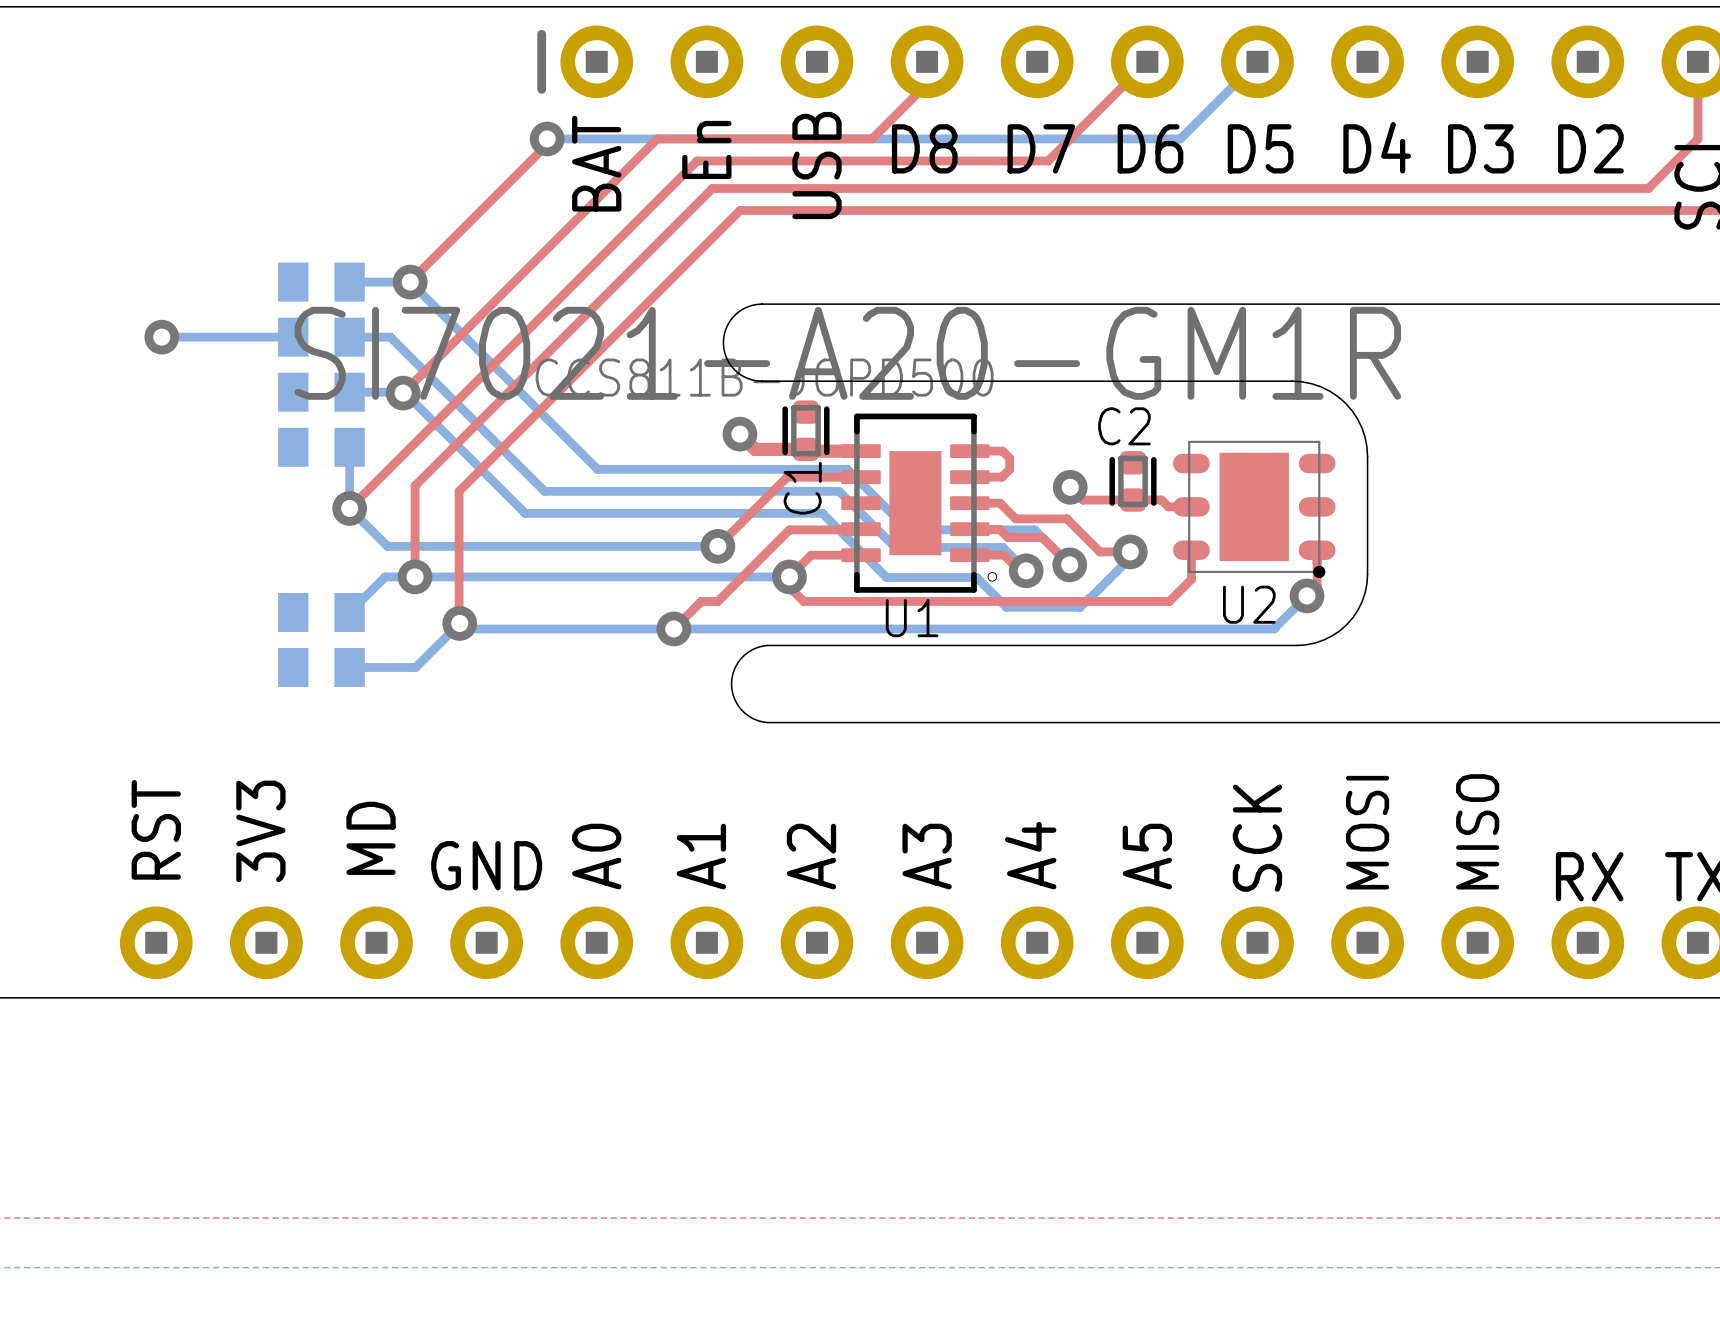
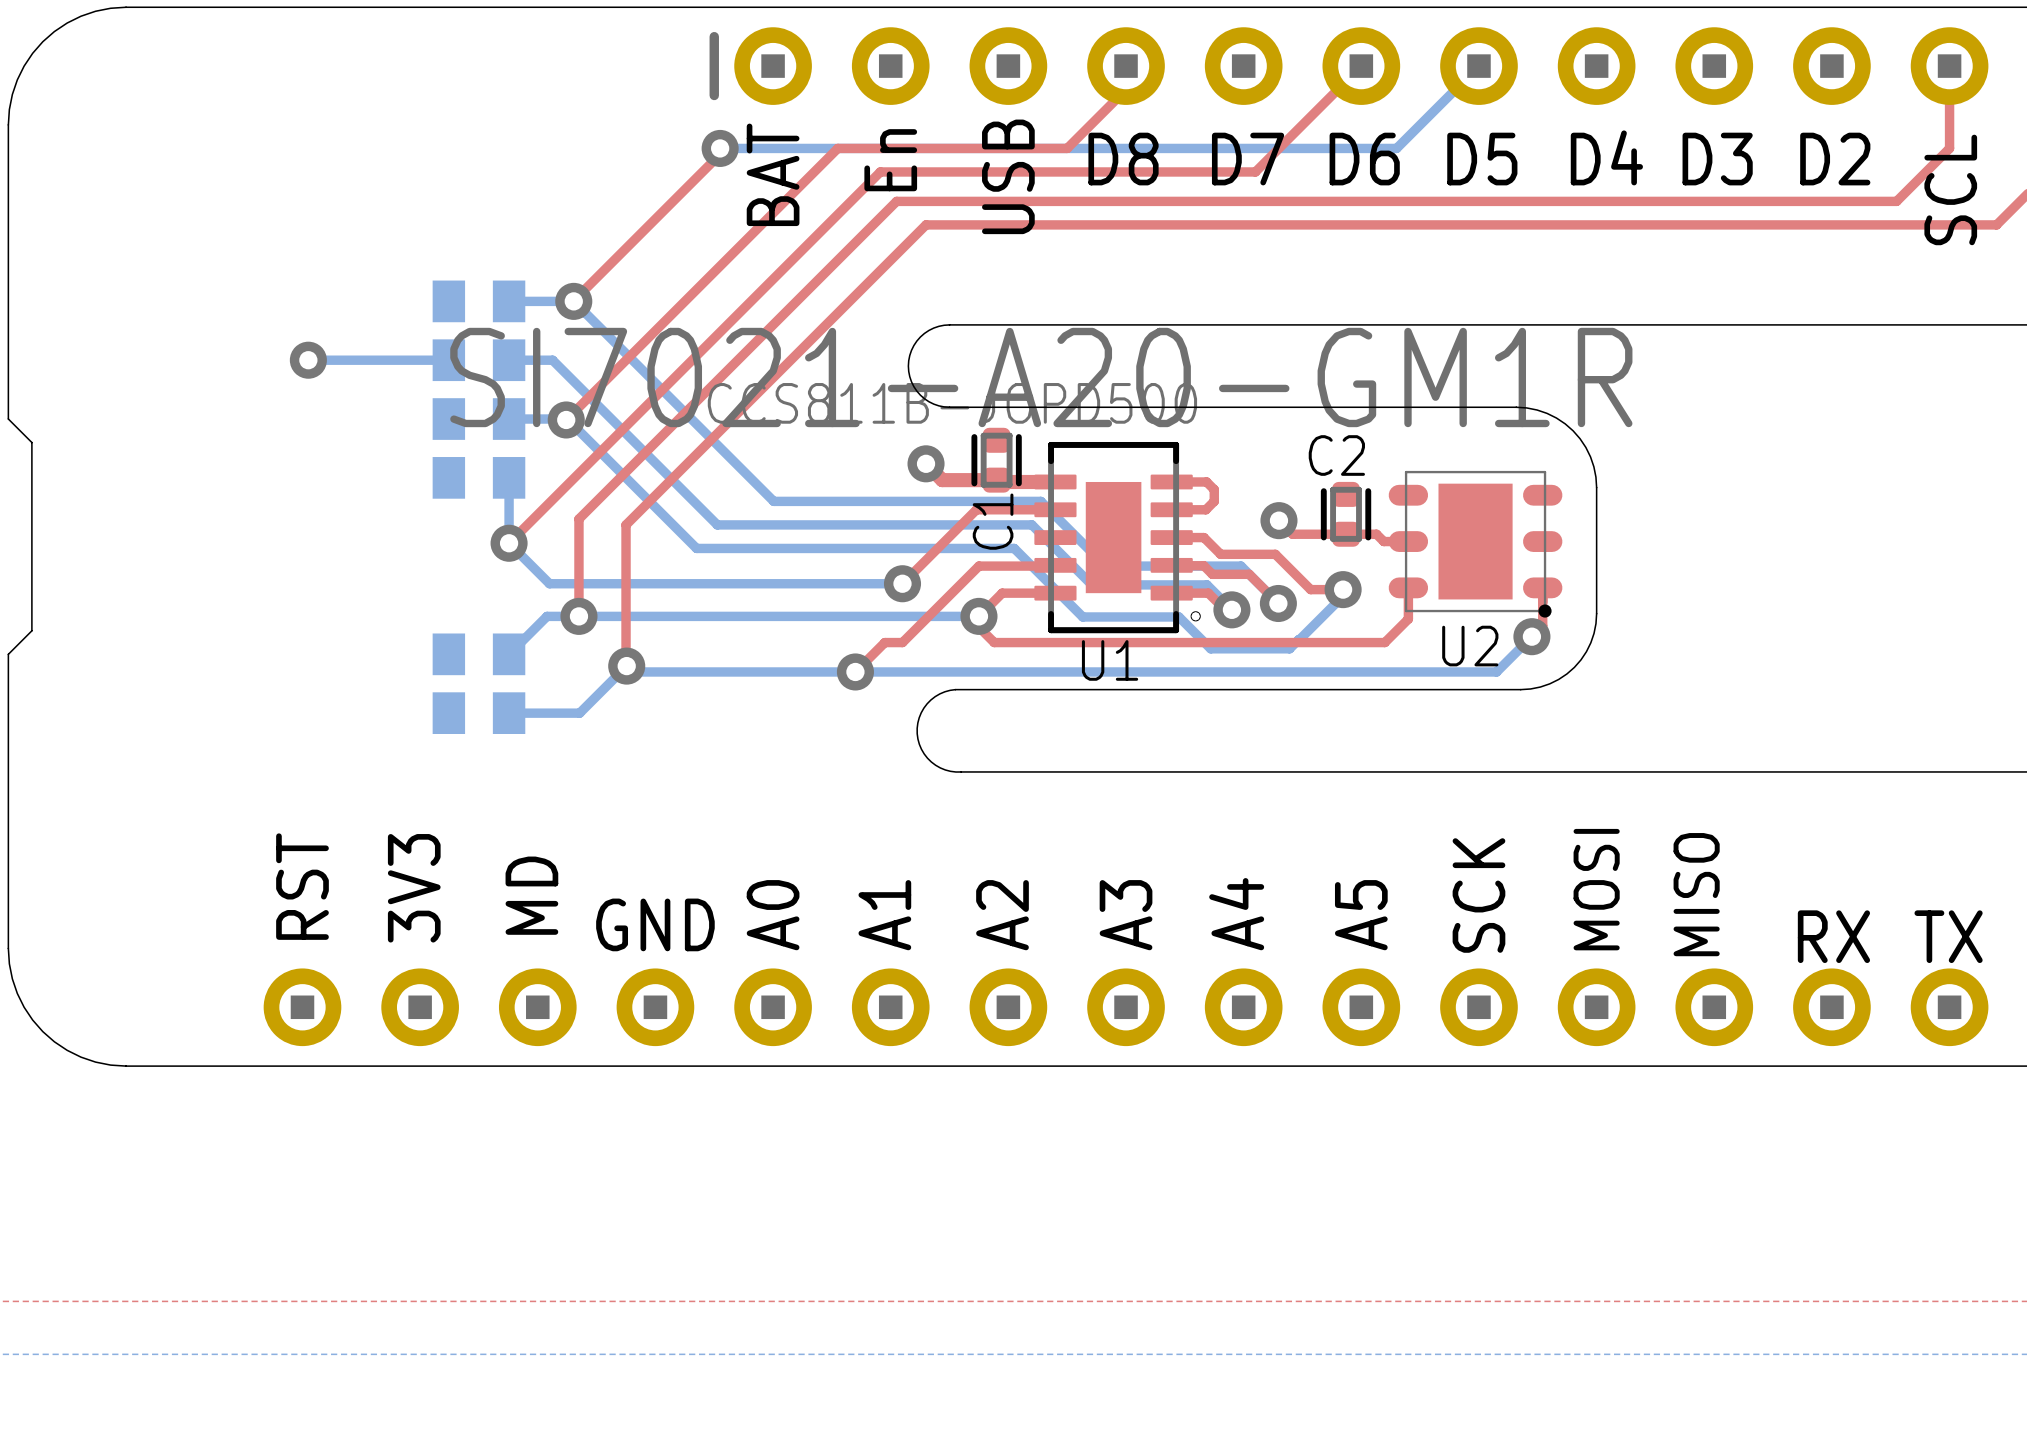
text position: MISO (1477, 831) -> MISO (1696, 894)

